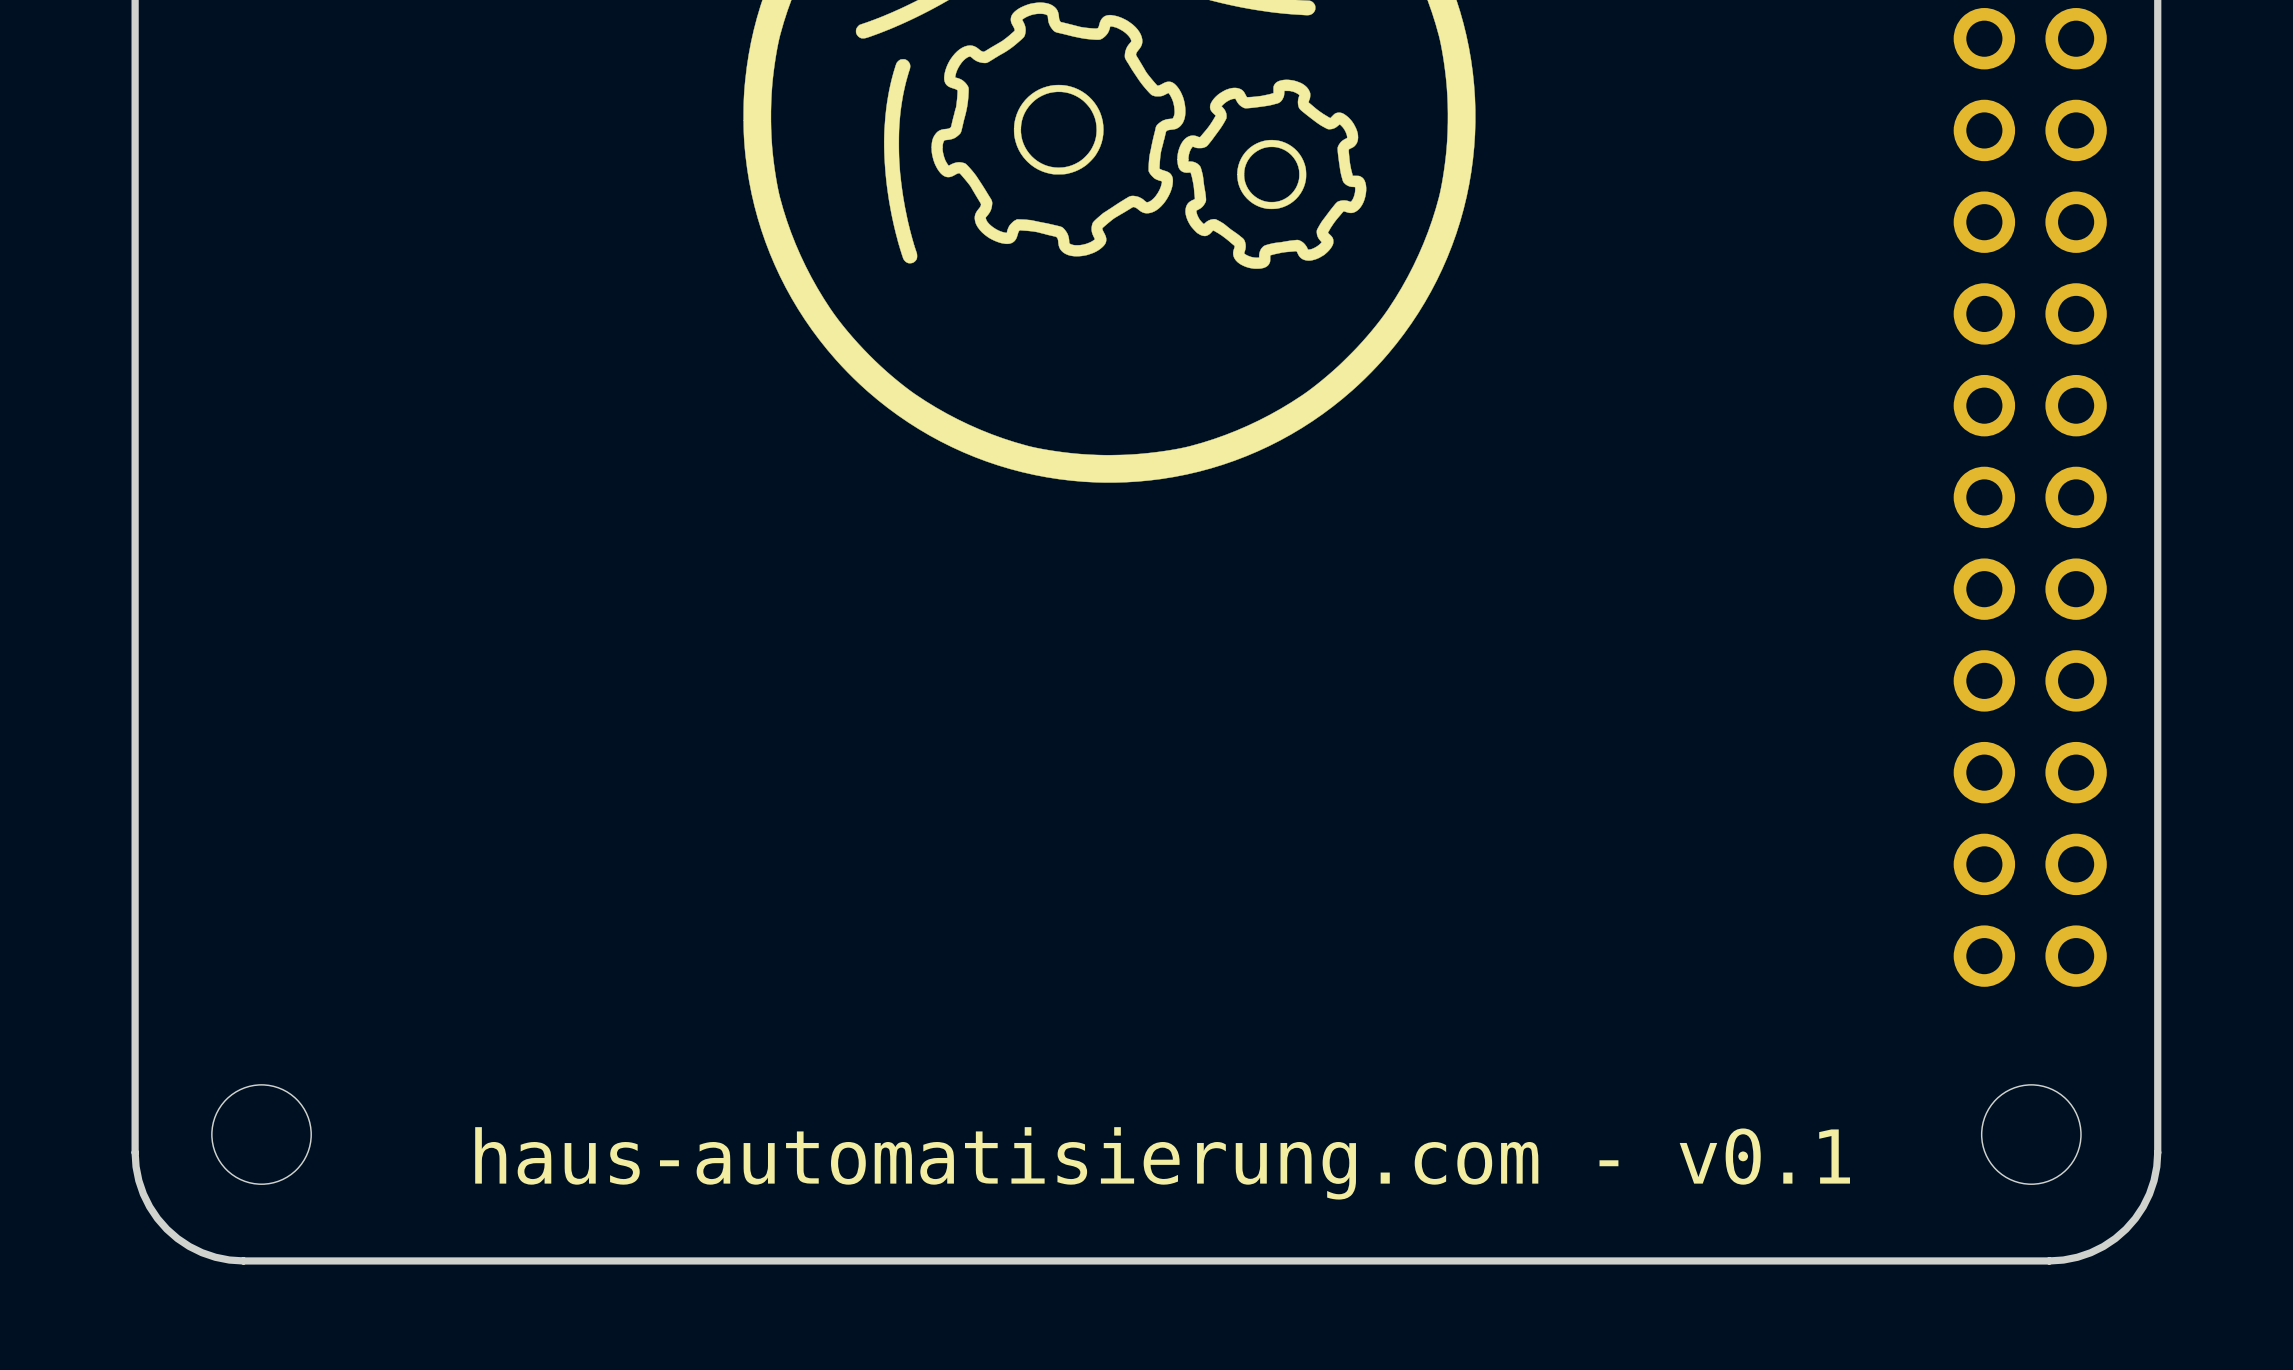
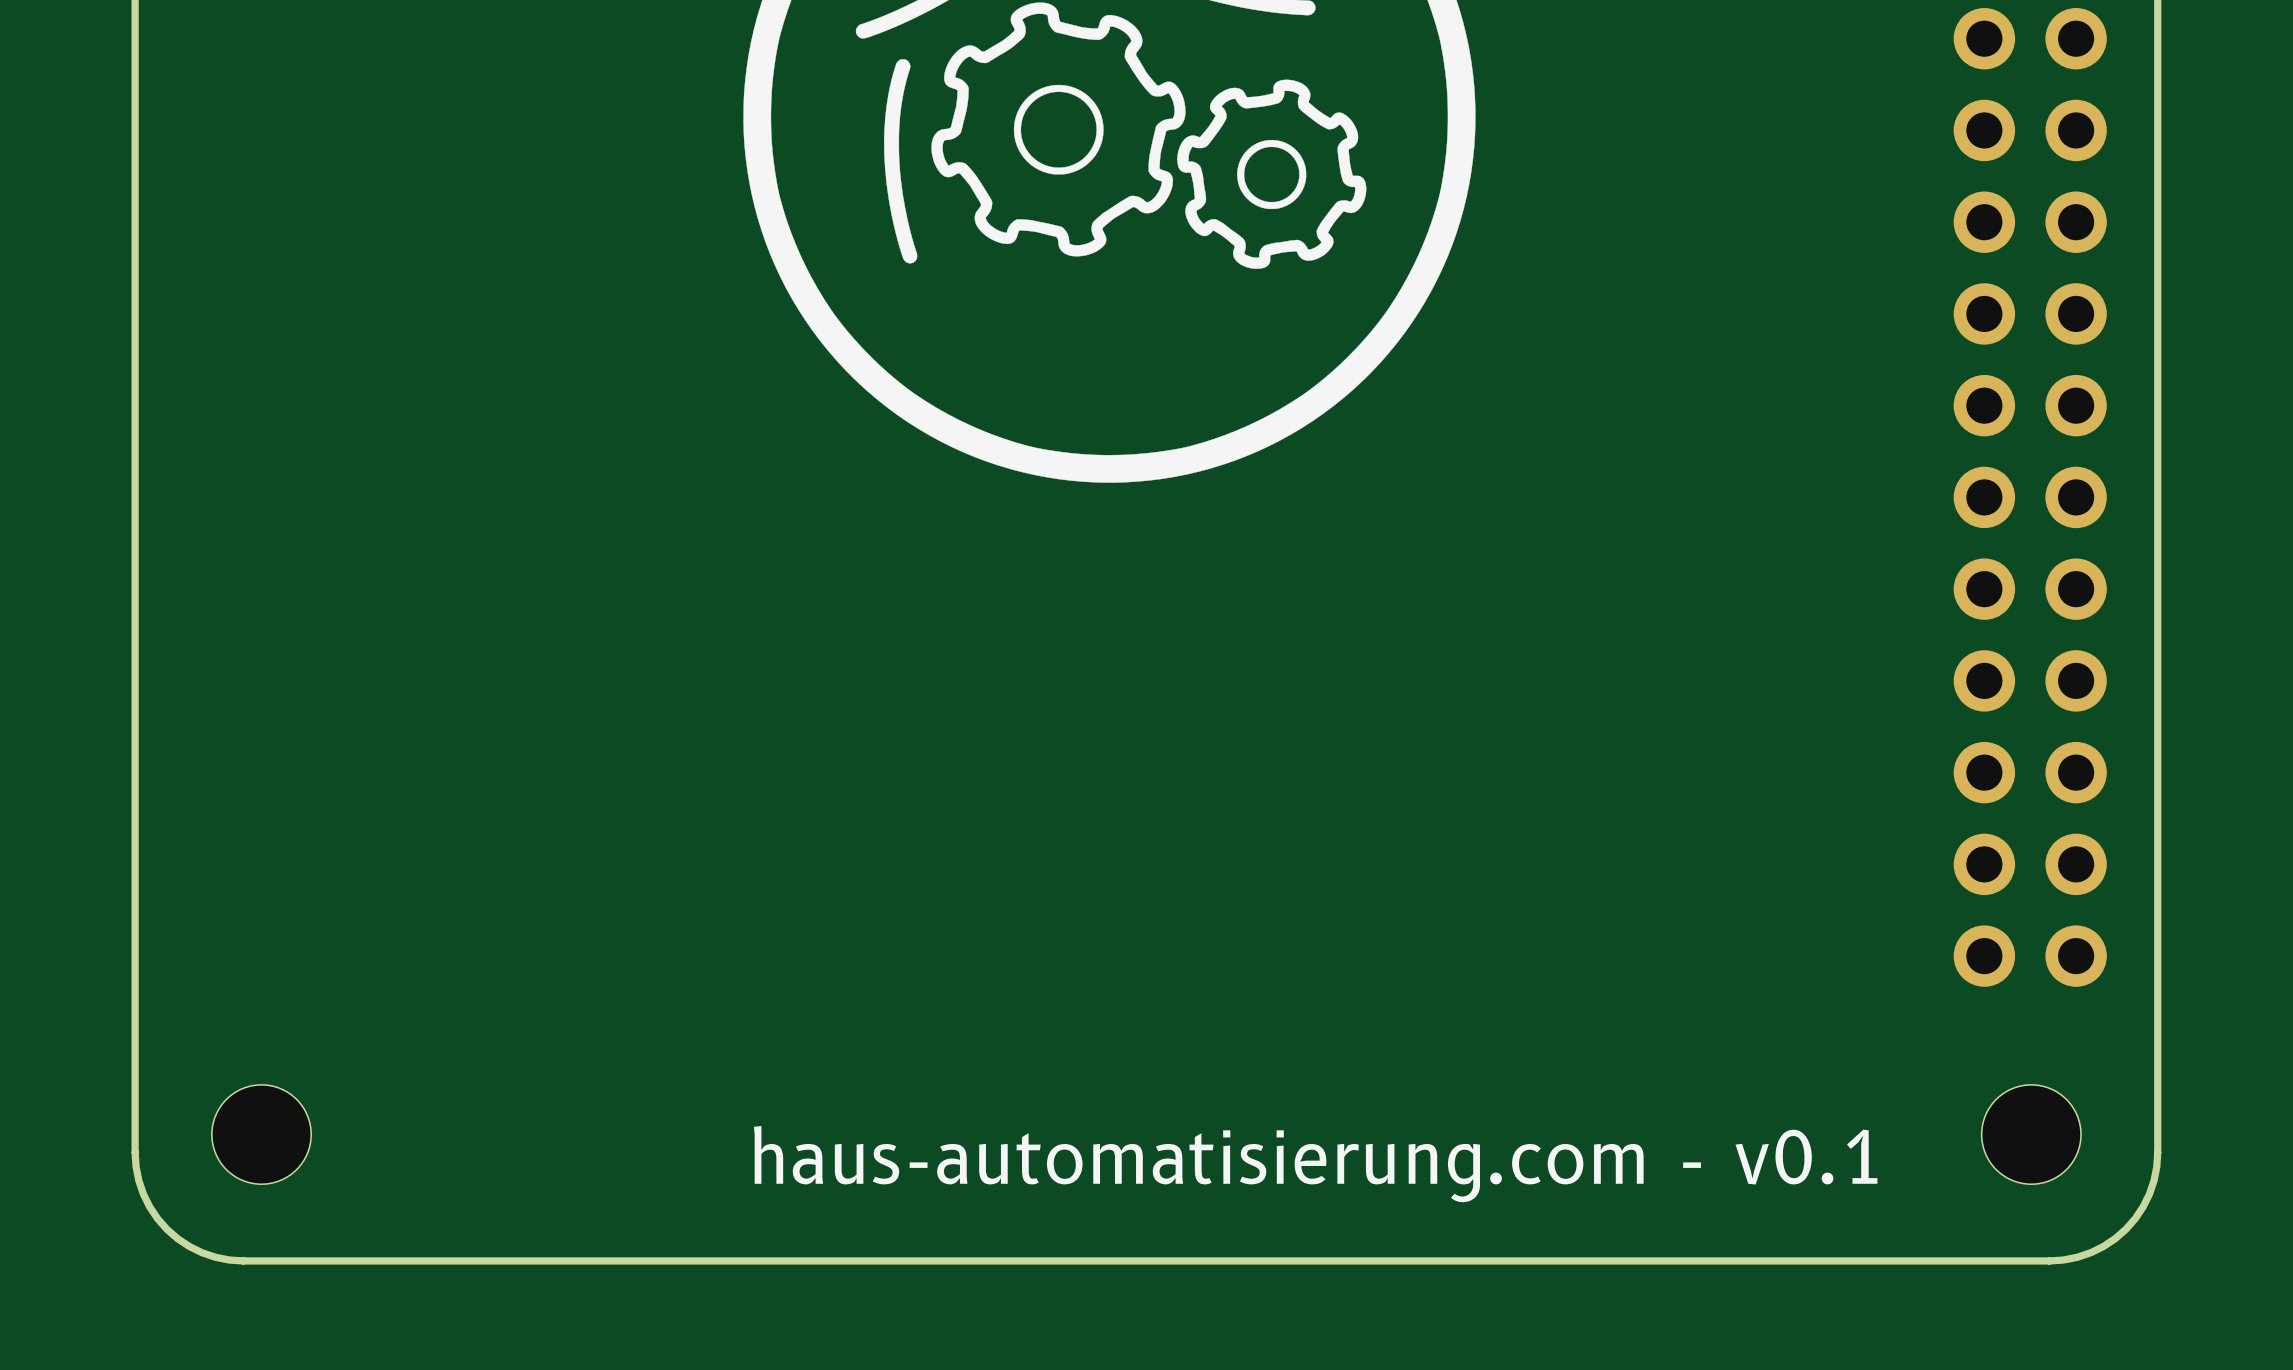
text position: haus-automatisierung.com - v0.1 (1162, 1163) -> haus-automatisierung.com - v0.1 (1315, 1164)

